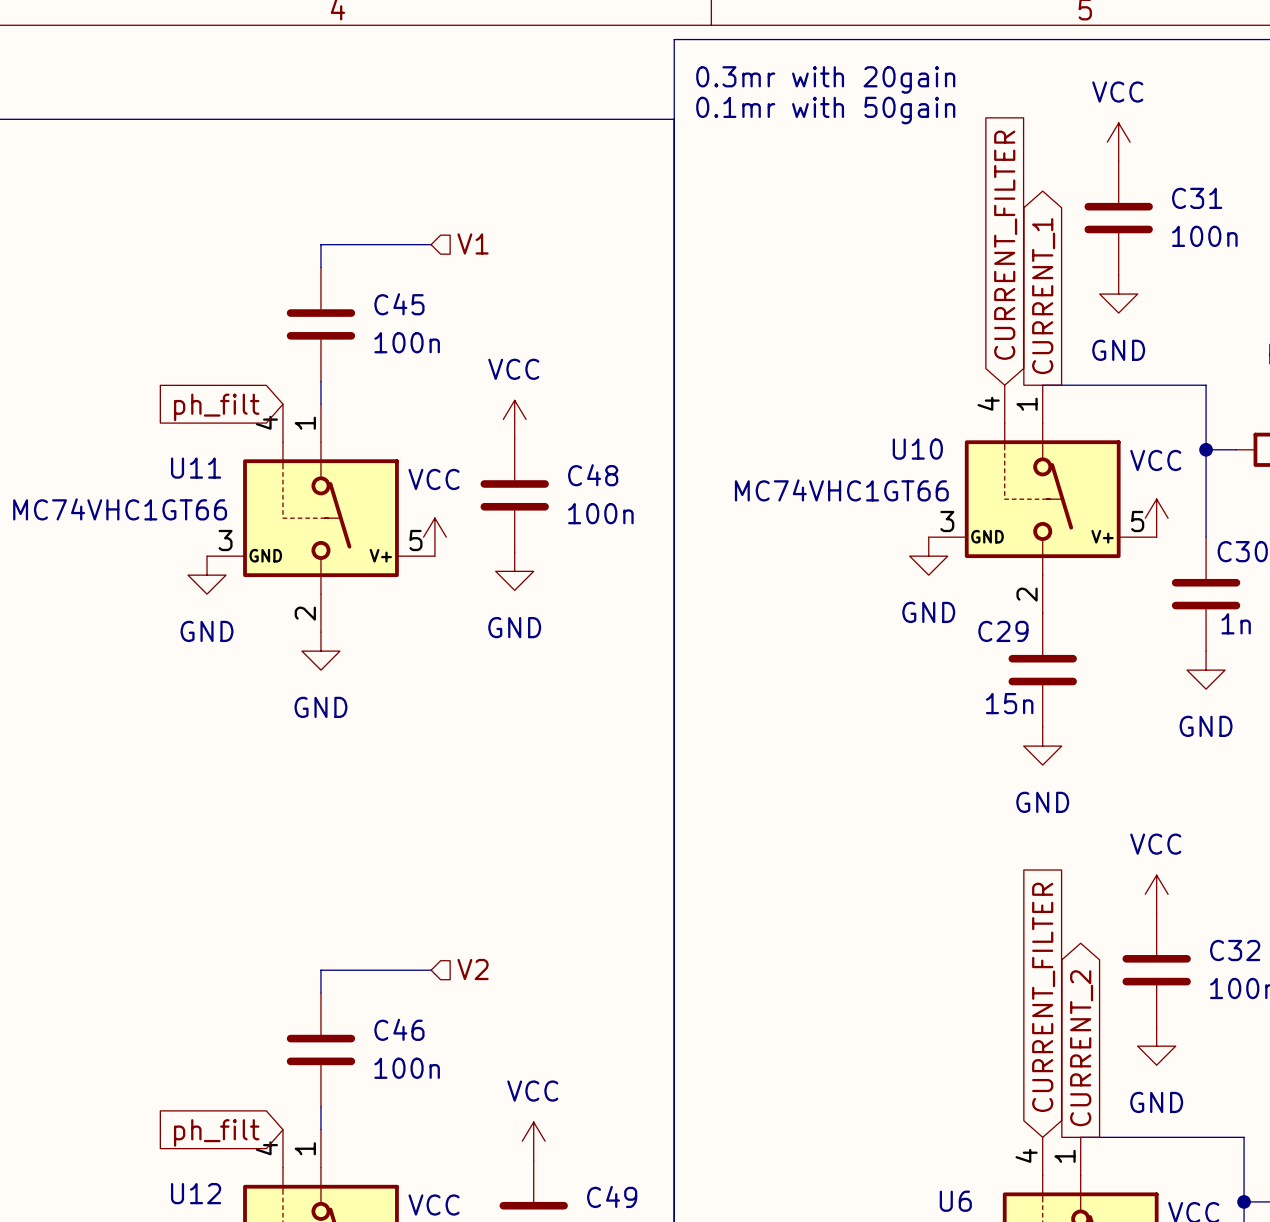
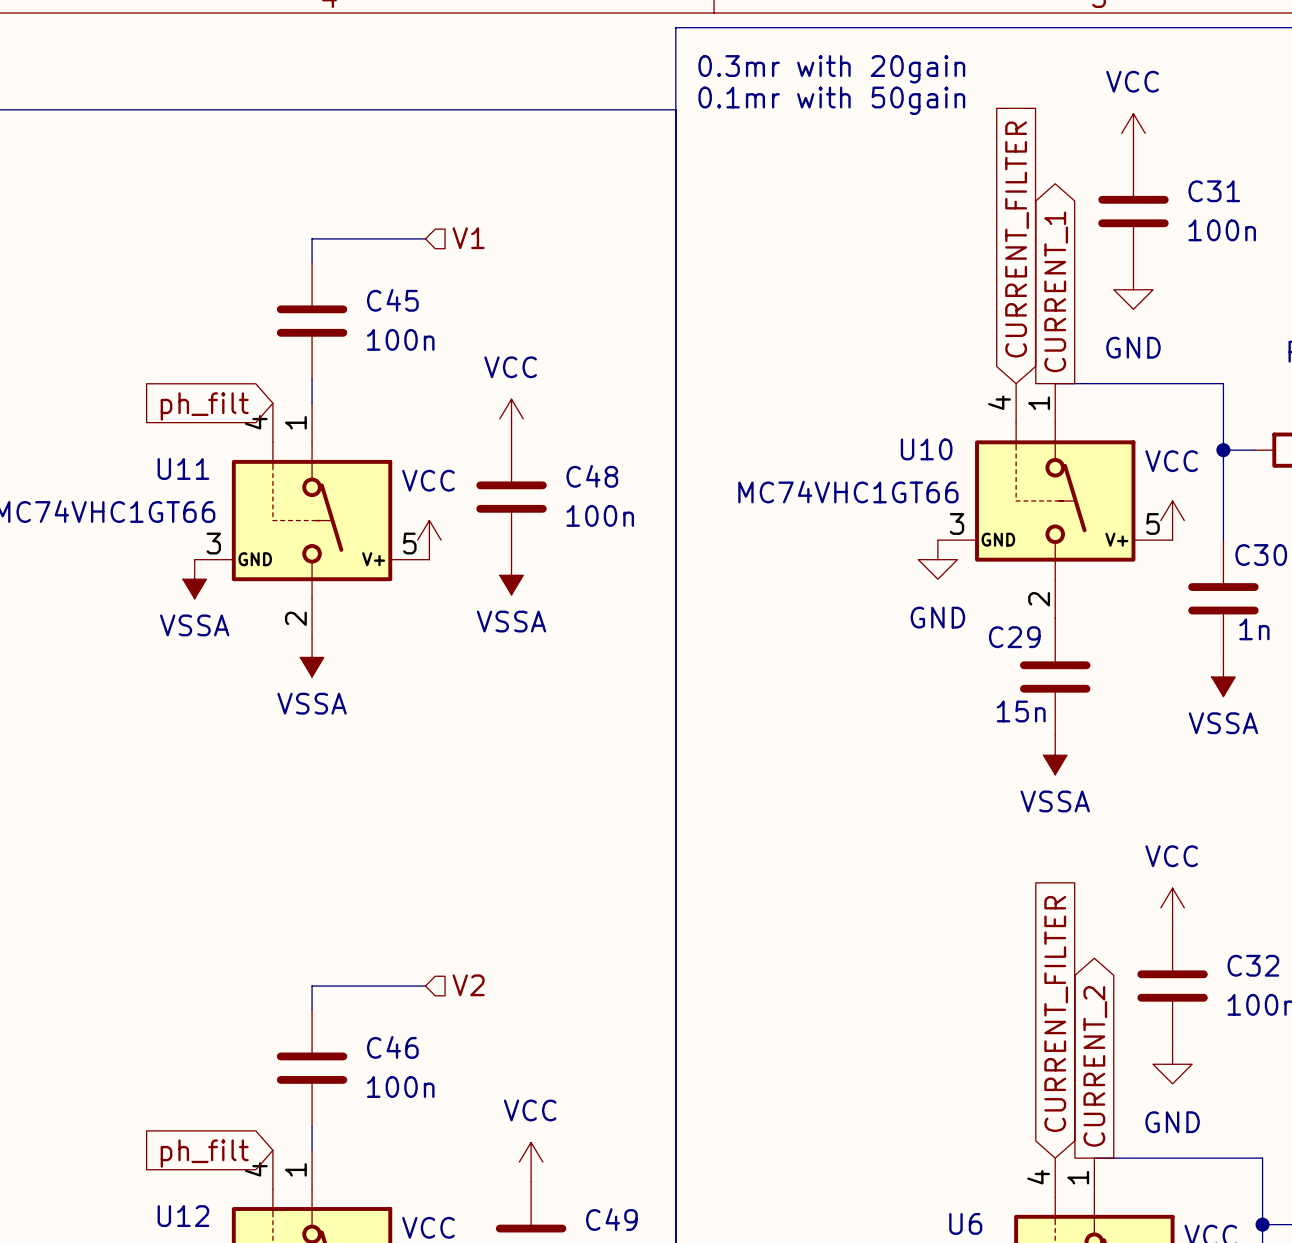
power symbol: GND (514, 571) -> VSSA (511, 575)
power symbol: GND (207, 575) -> VSSA (194, 579)
power symbol: GND (320, 651) -> VSSA (312, 657)
power symbol: GND (1206, 670) -> VSSA (1223, 677)
power symbol: GND (1042, 746) -> VSSA (1055, 755)

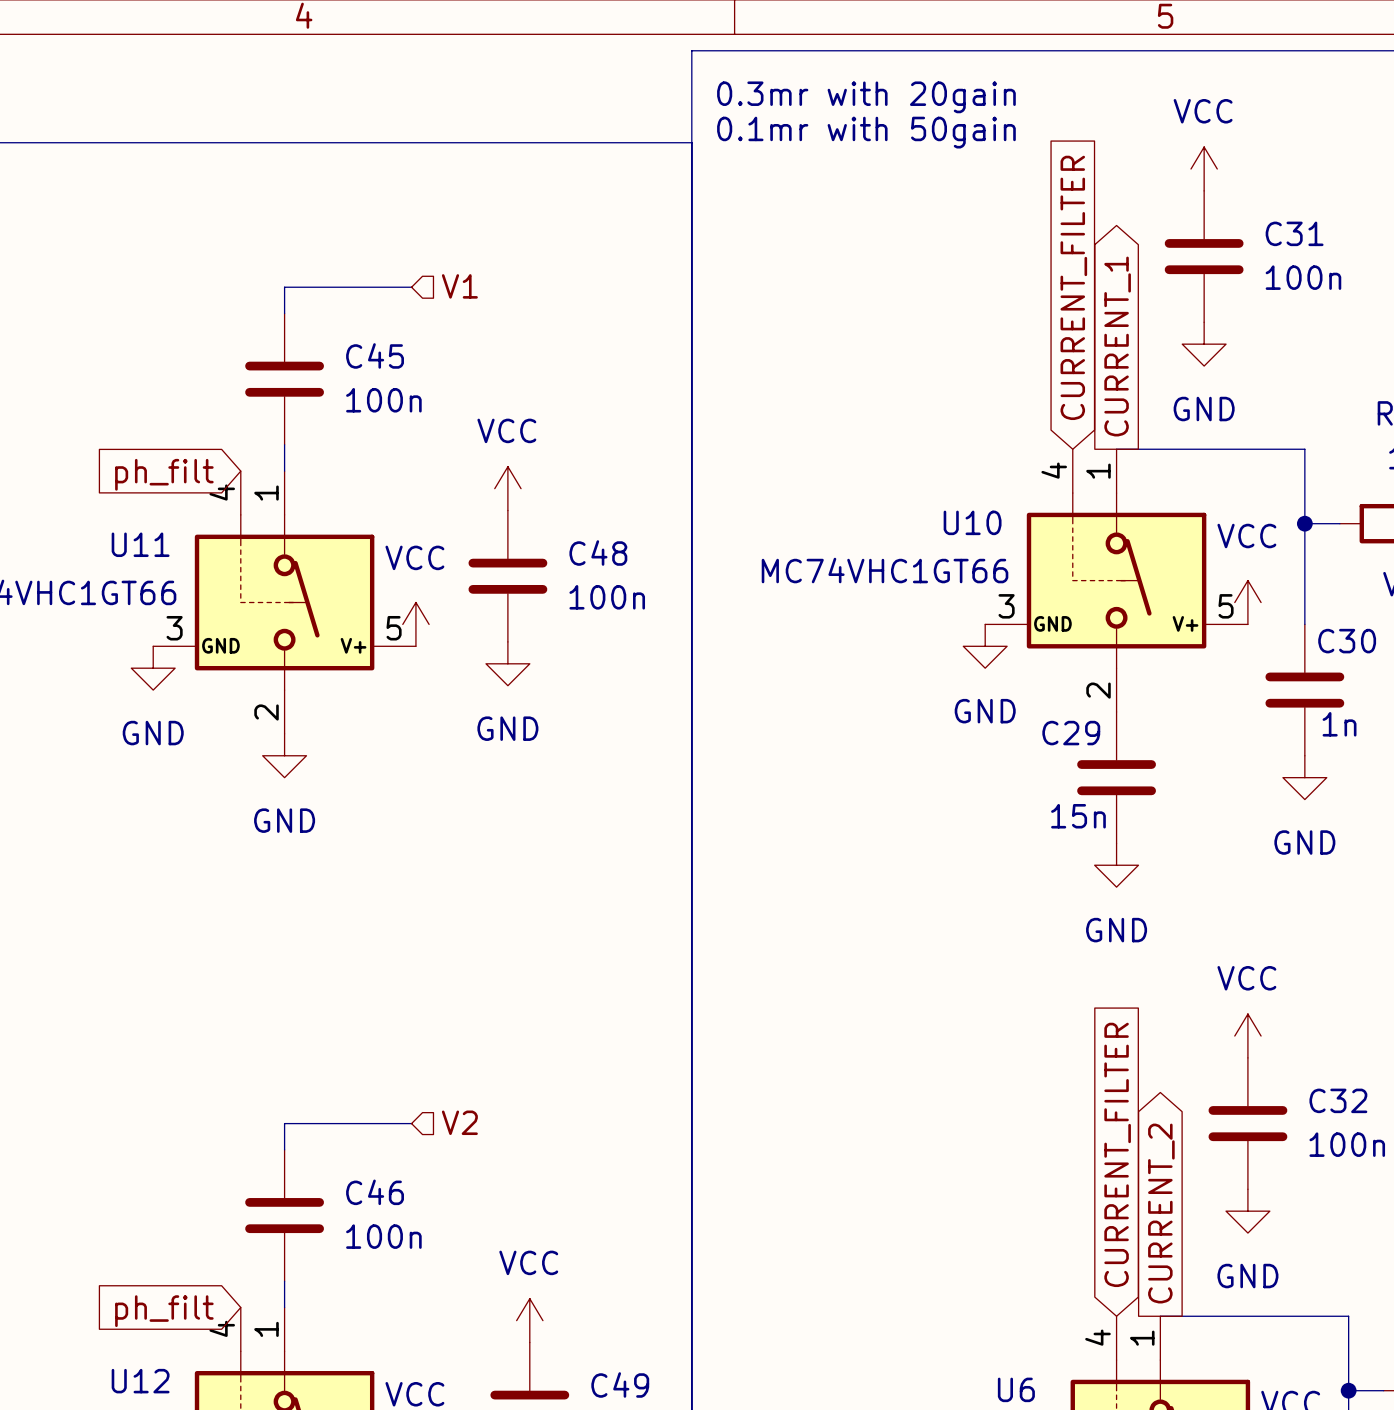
power symbol: VSSA (511, 575) -> GND (507, 663)
power symbol: VSSA (194, 579) -> GND (153, 668)
power symbol: VSSA (312, 657) -> GND (284, 755)
power symbol: VSSA (1223, 677) -> GND (1304, 777)
power symbol: VSSA (1055, 755) -> GND (1116, 865)

